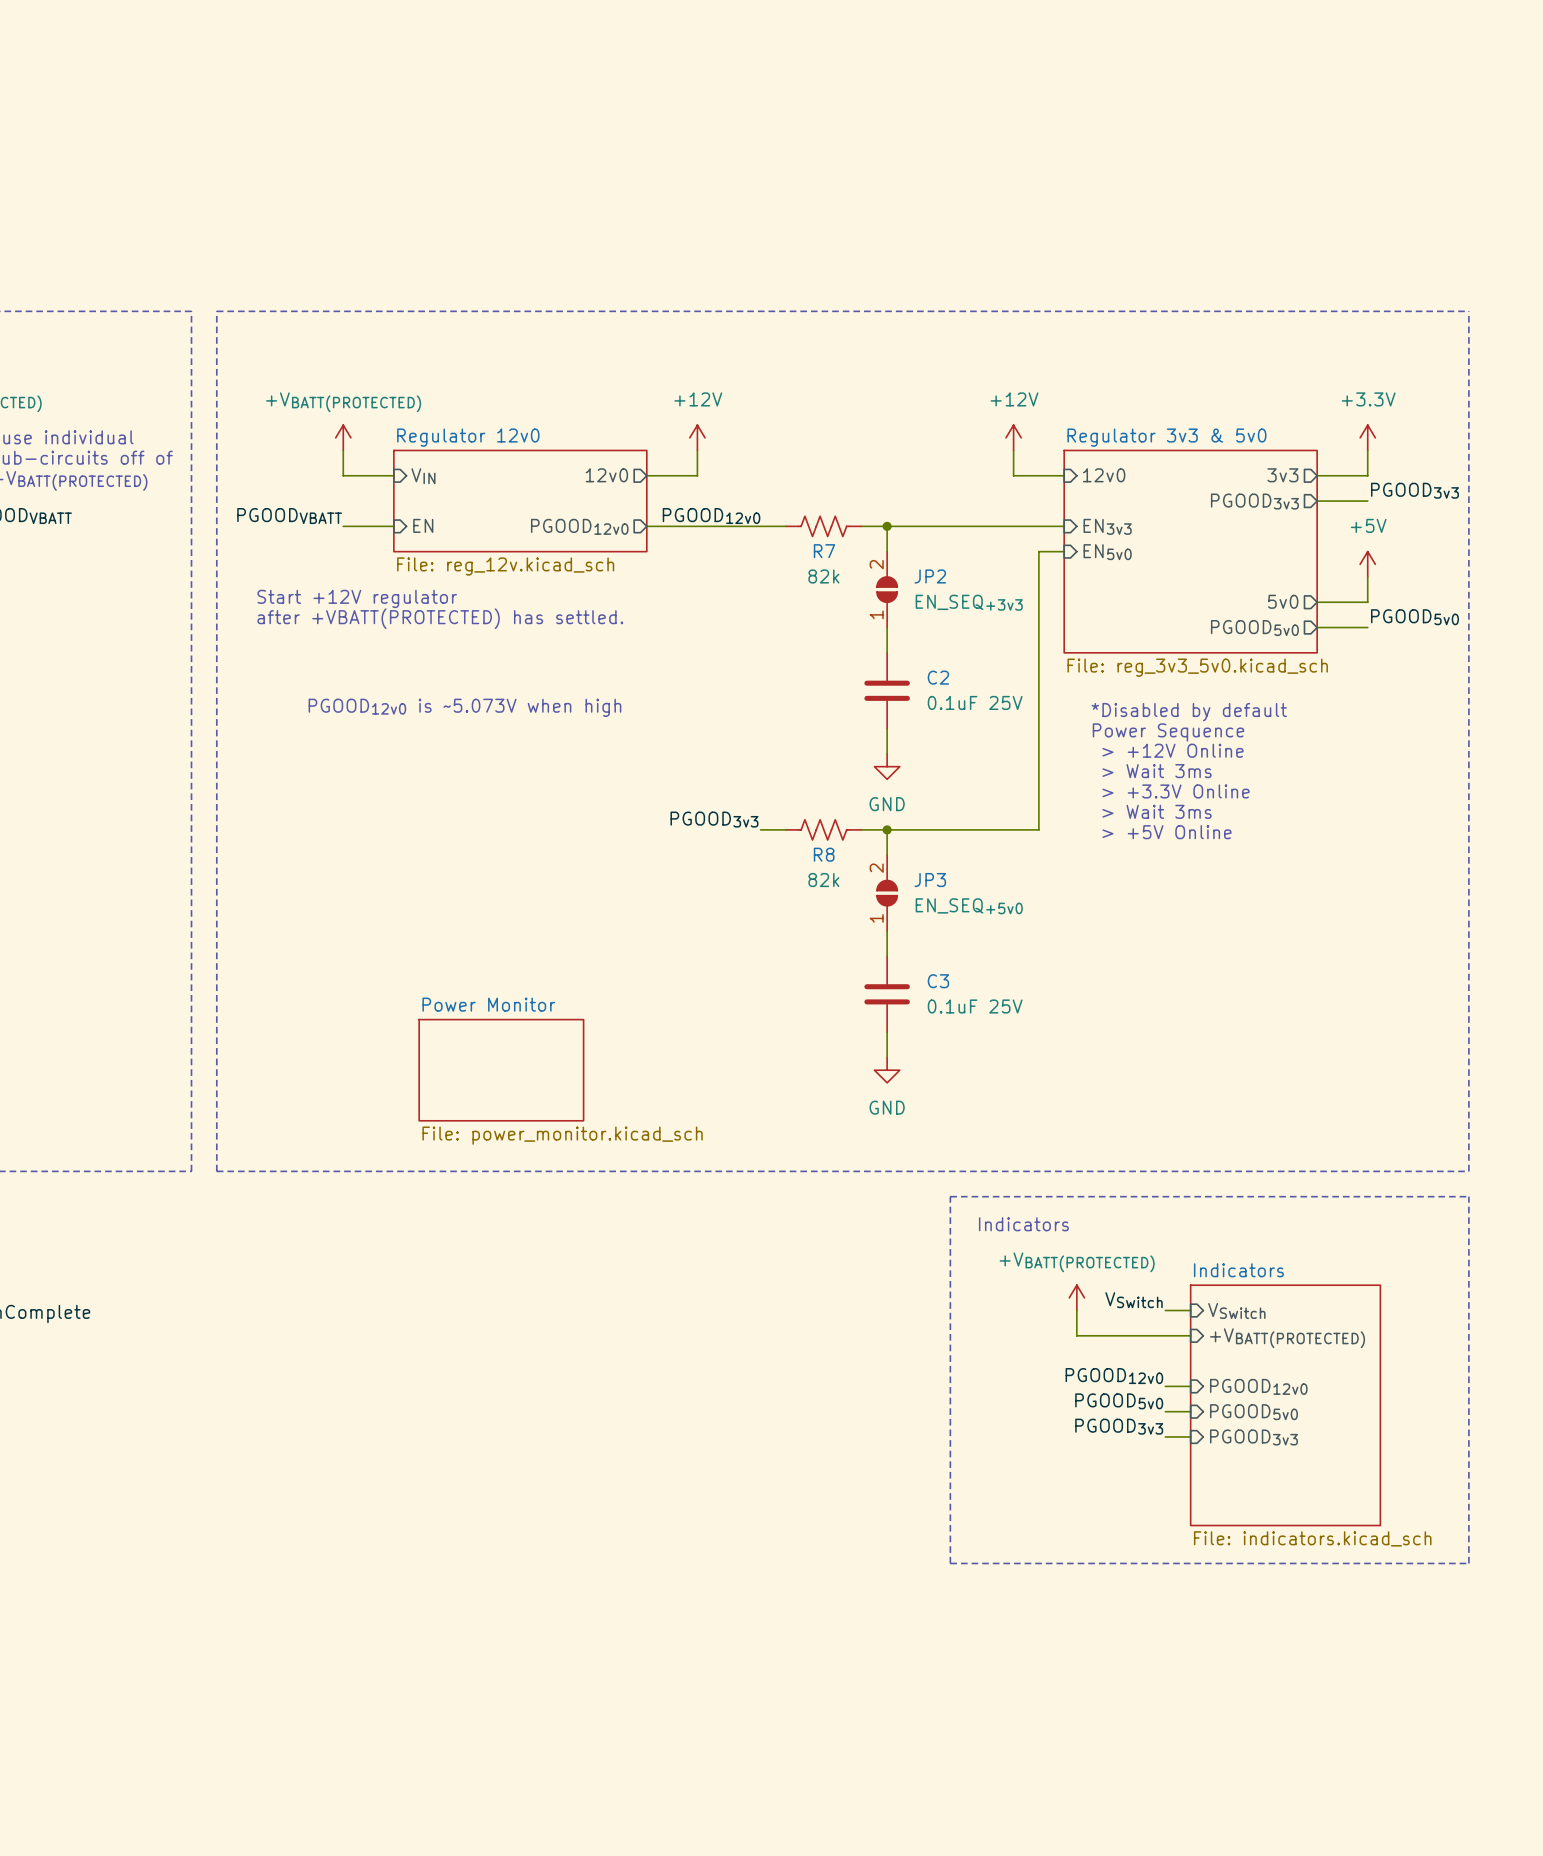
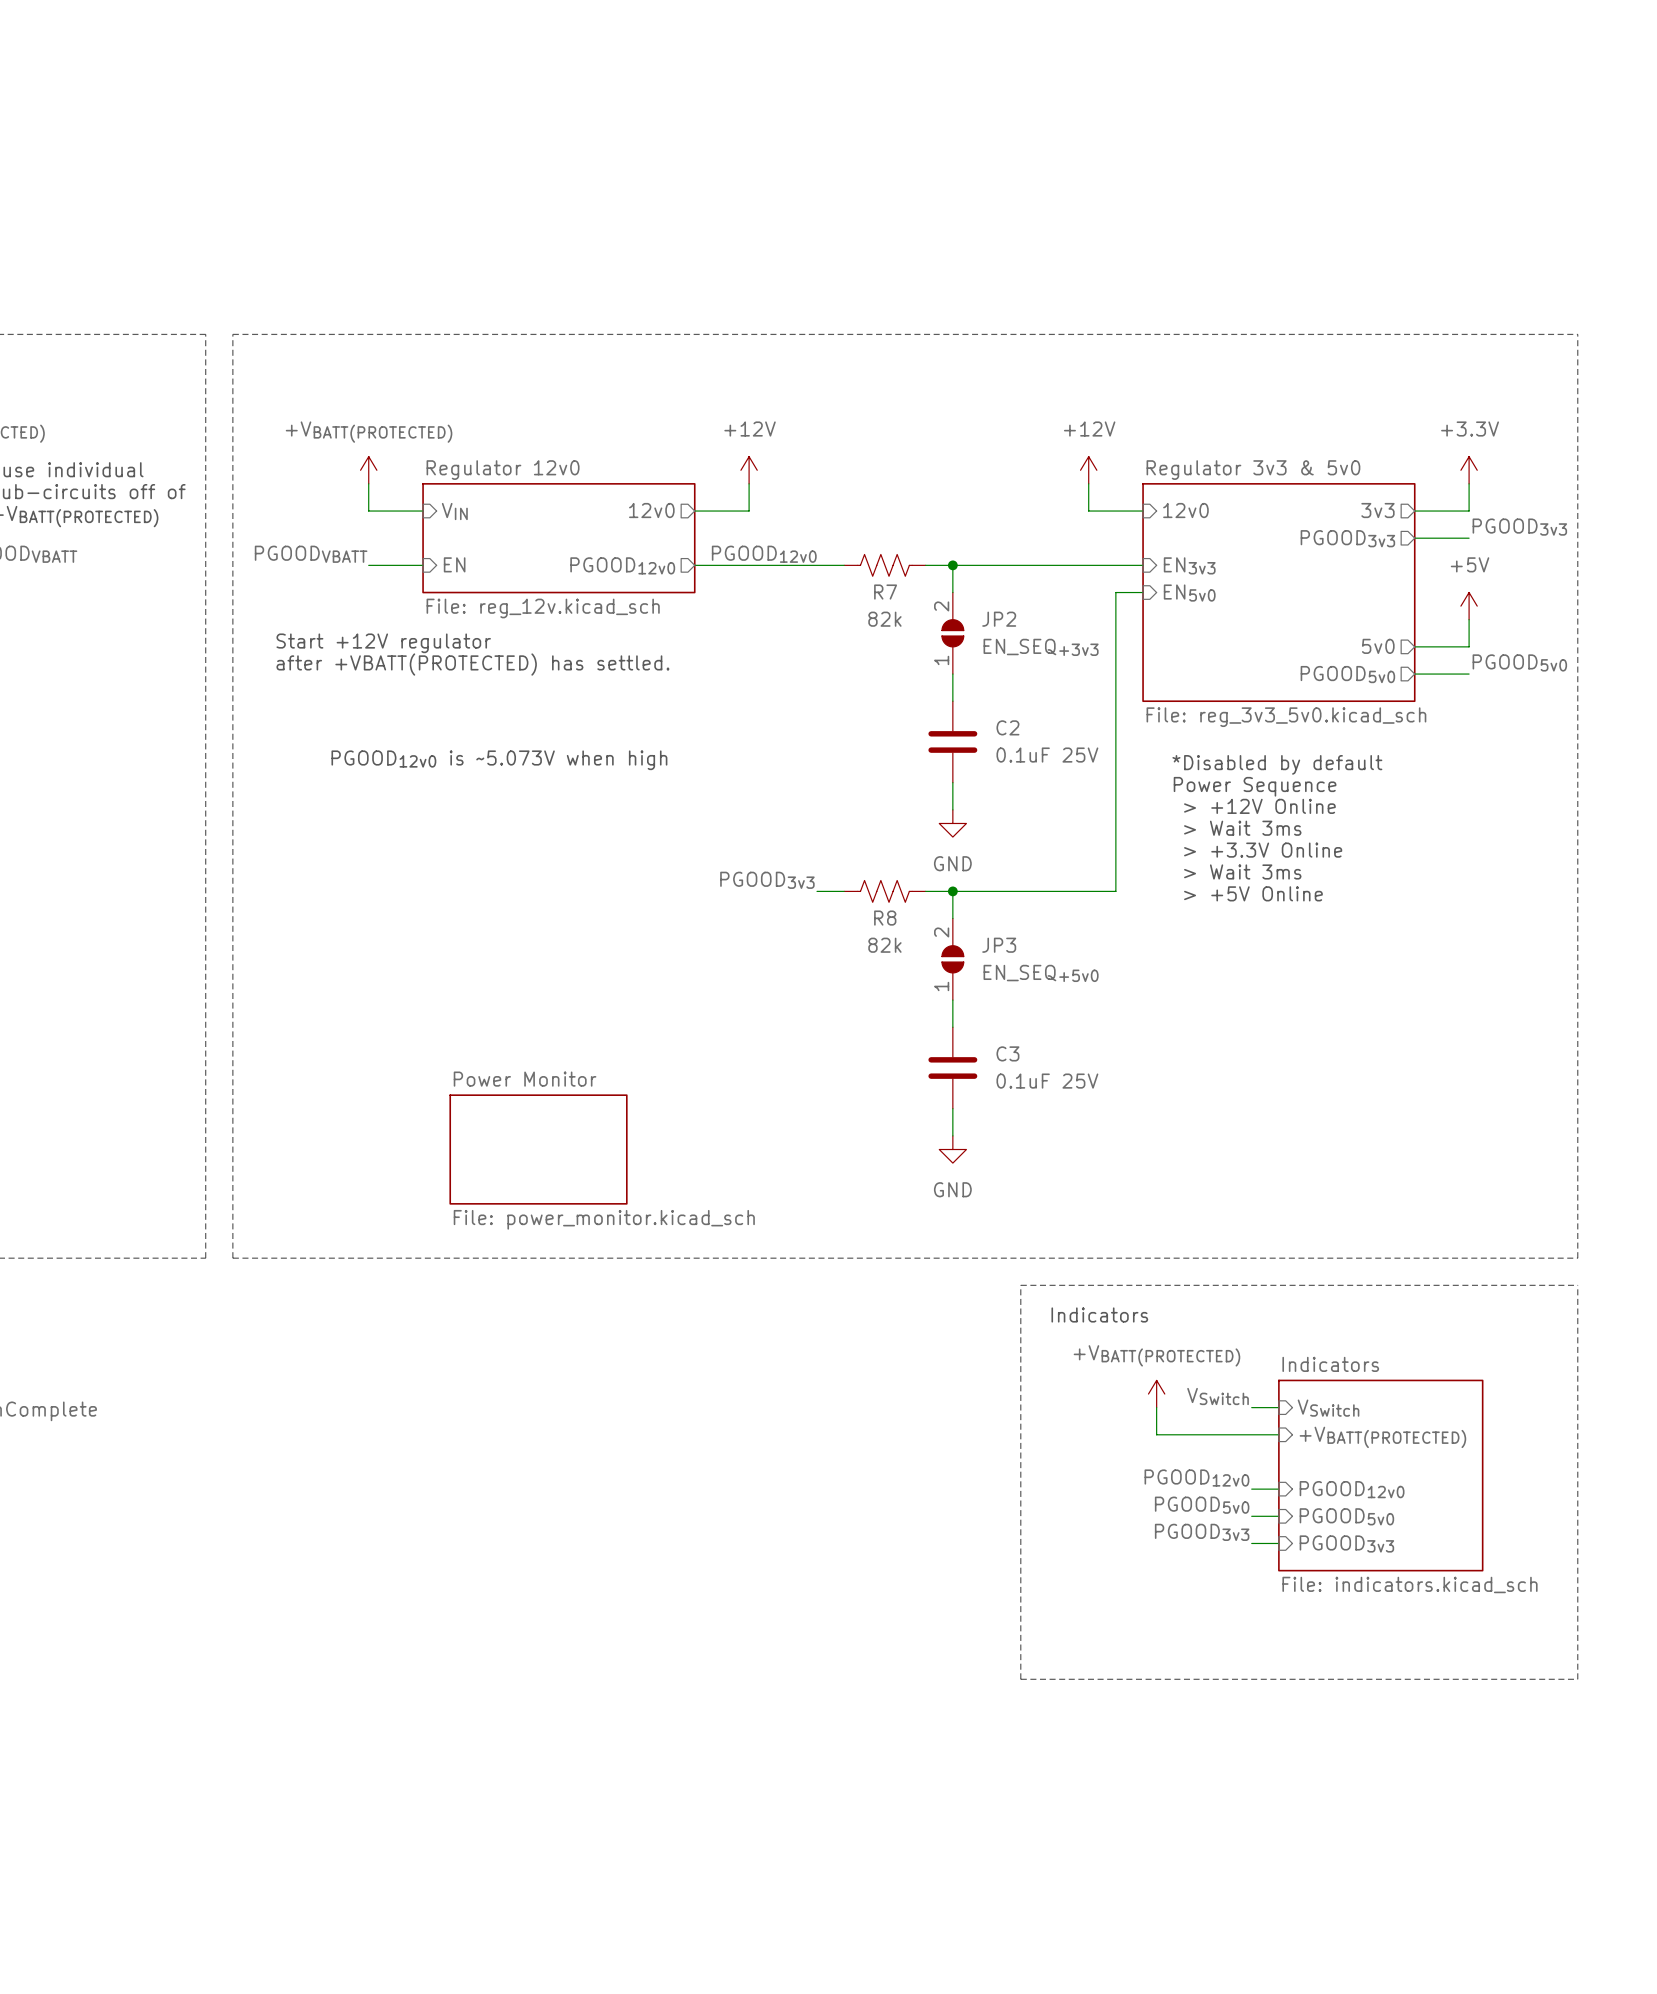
sheet Indicators: none -> File: indicators.kicad_sch (1380, 1475)
sheet Indicators: File: indicators.kicad_sch (1285, 1405) -> none

